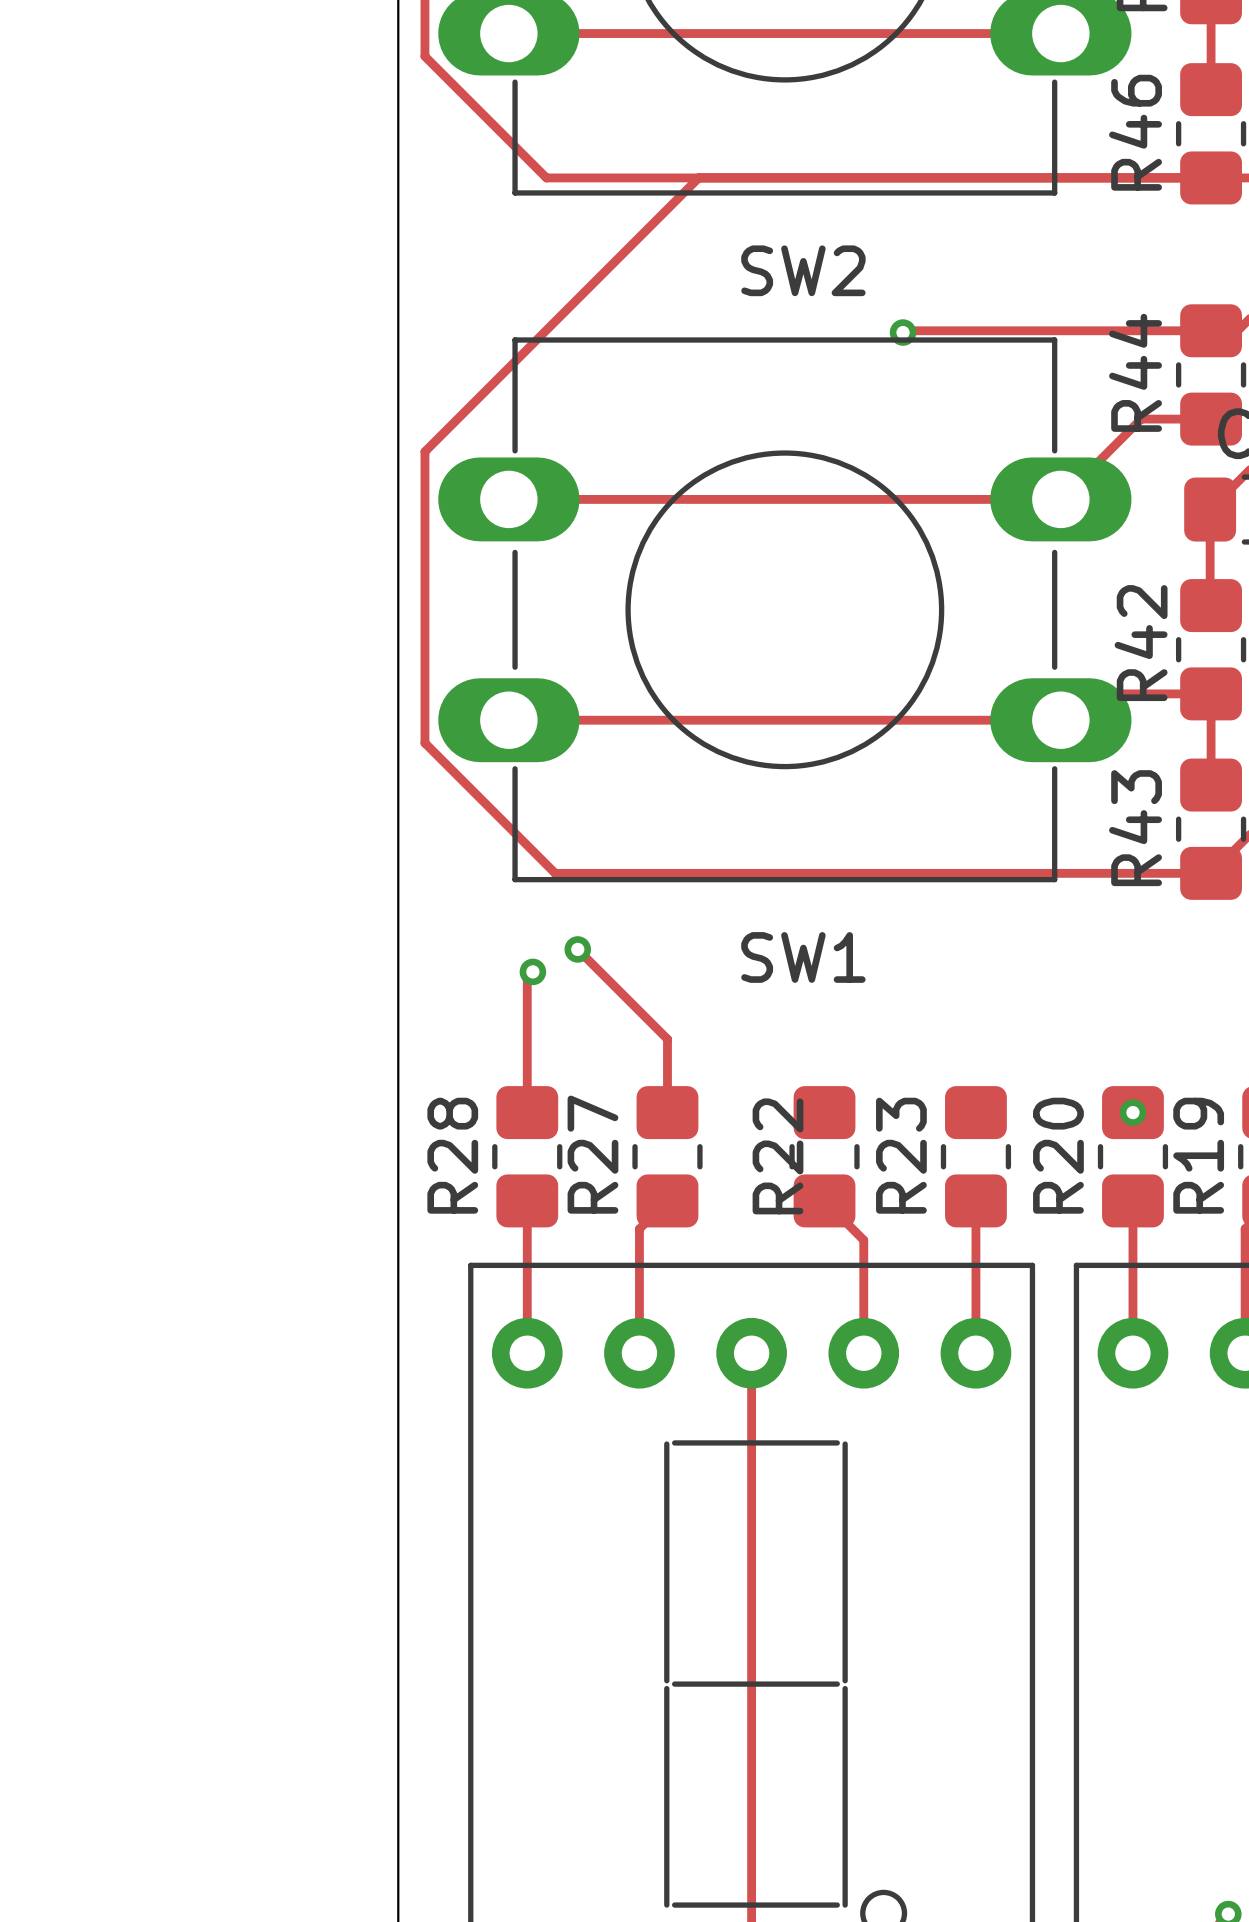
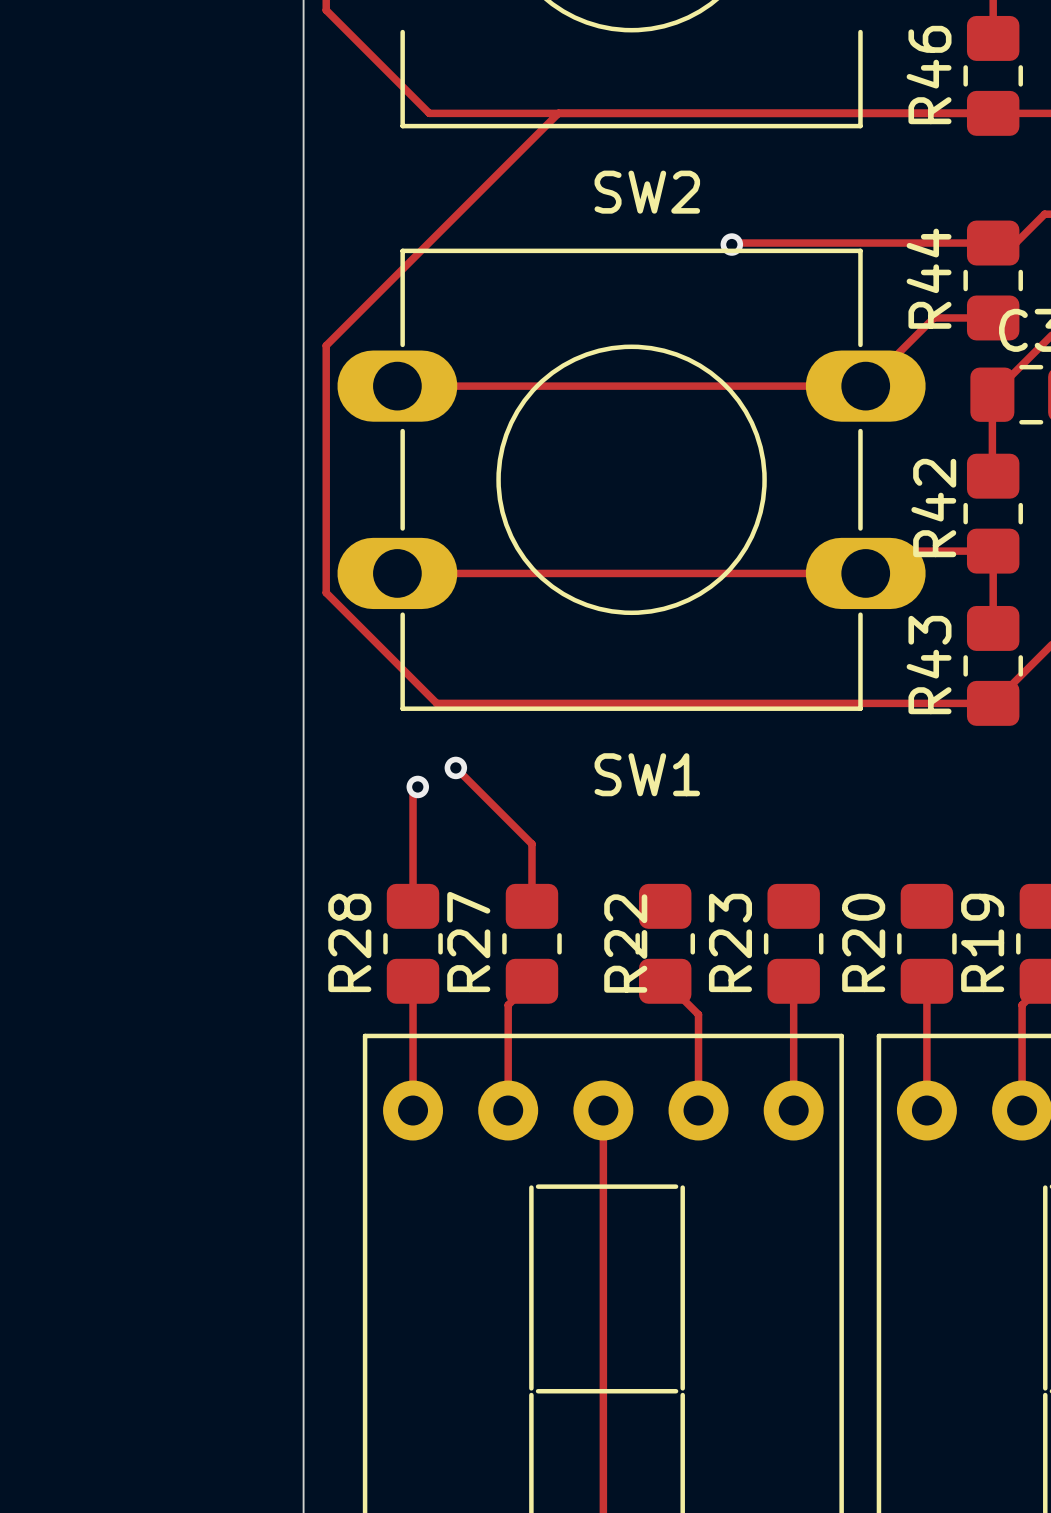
via: (1132, 1112) -> none

